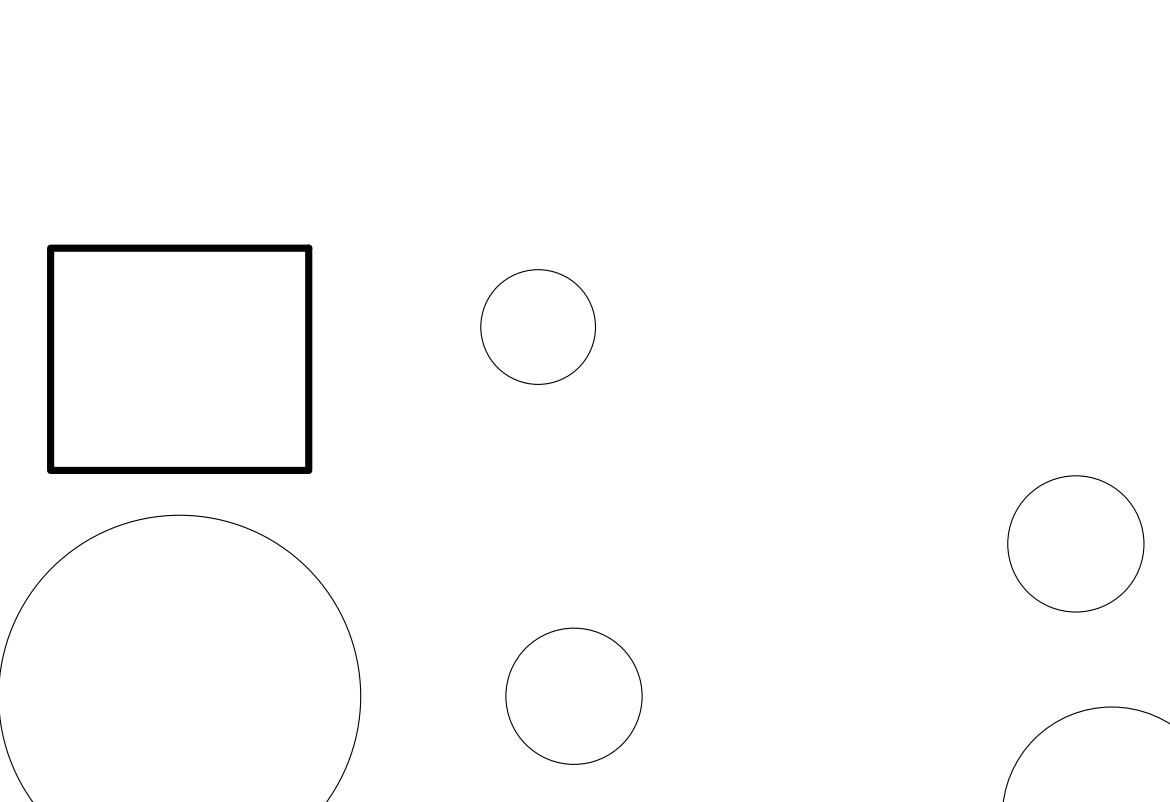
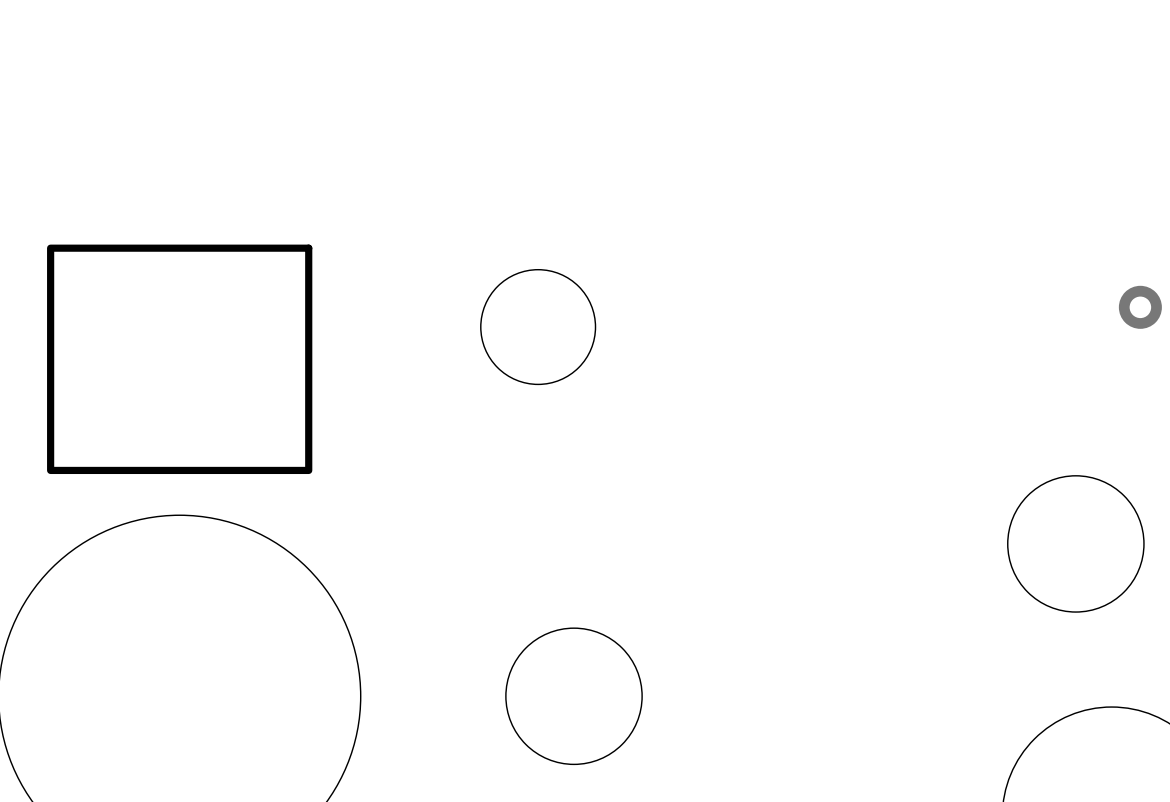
via: none -> (1140, 307)

